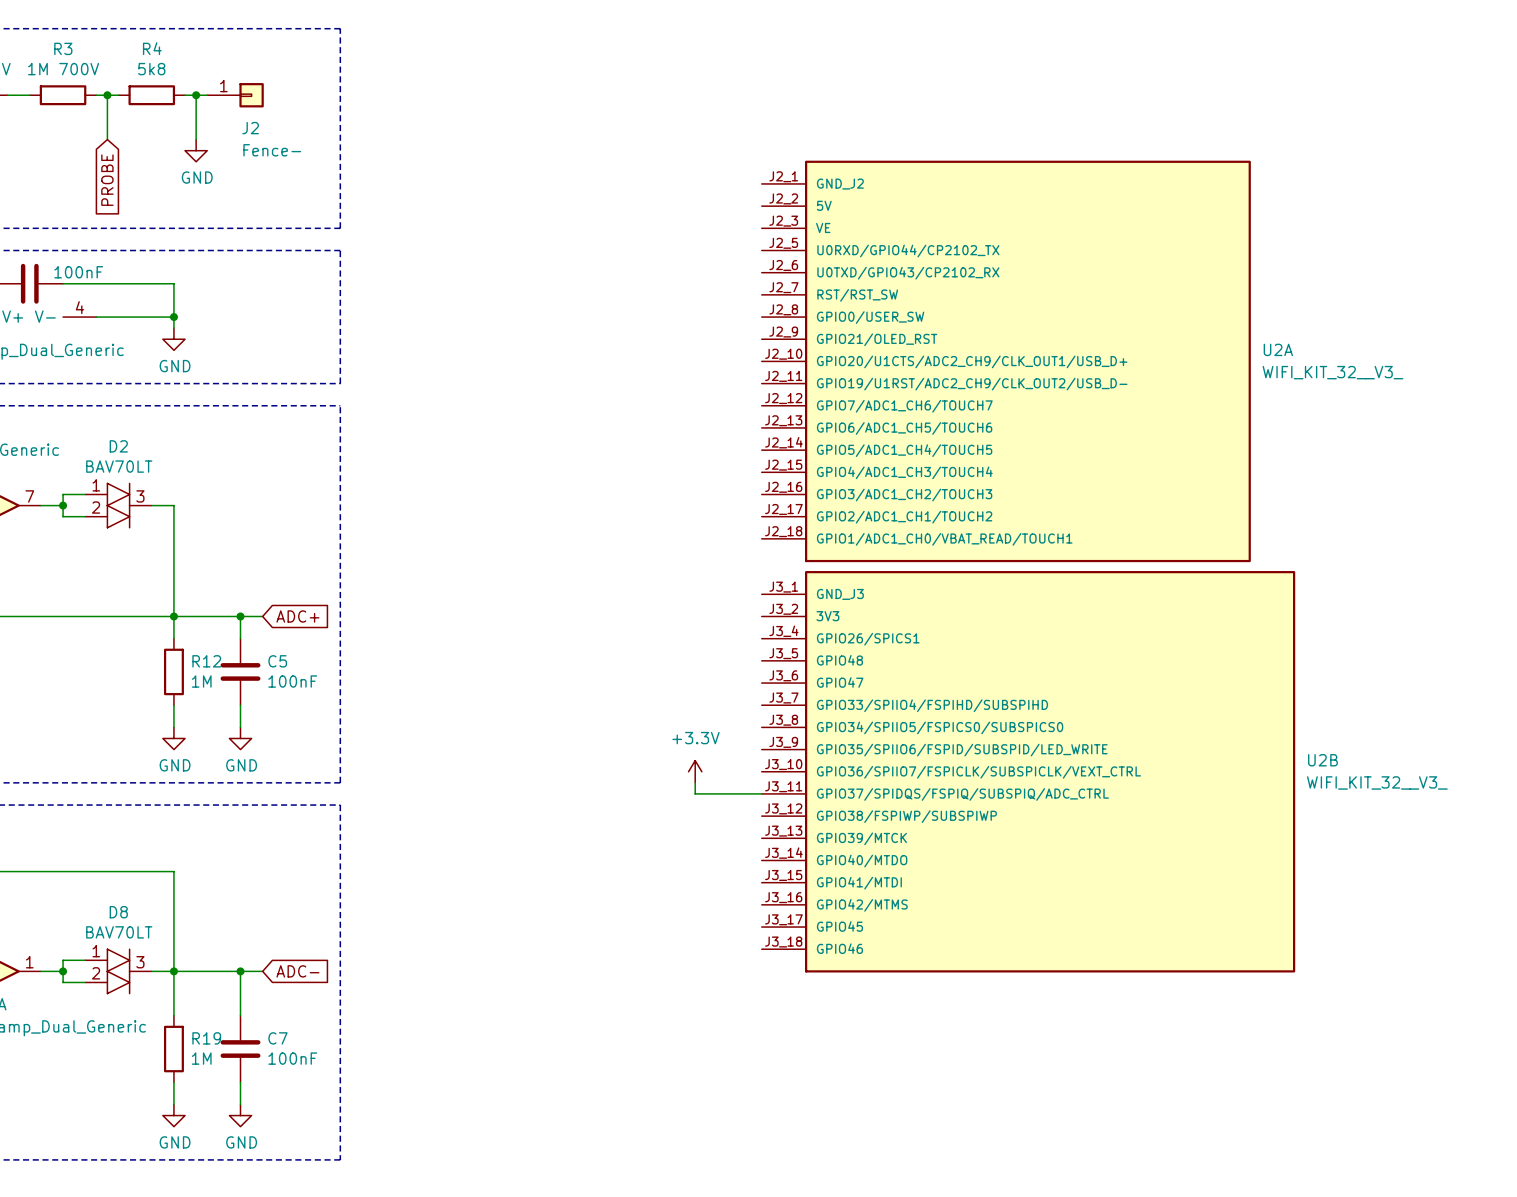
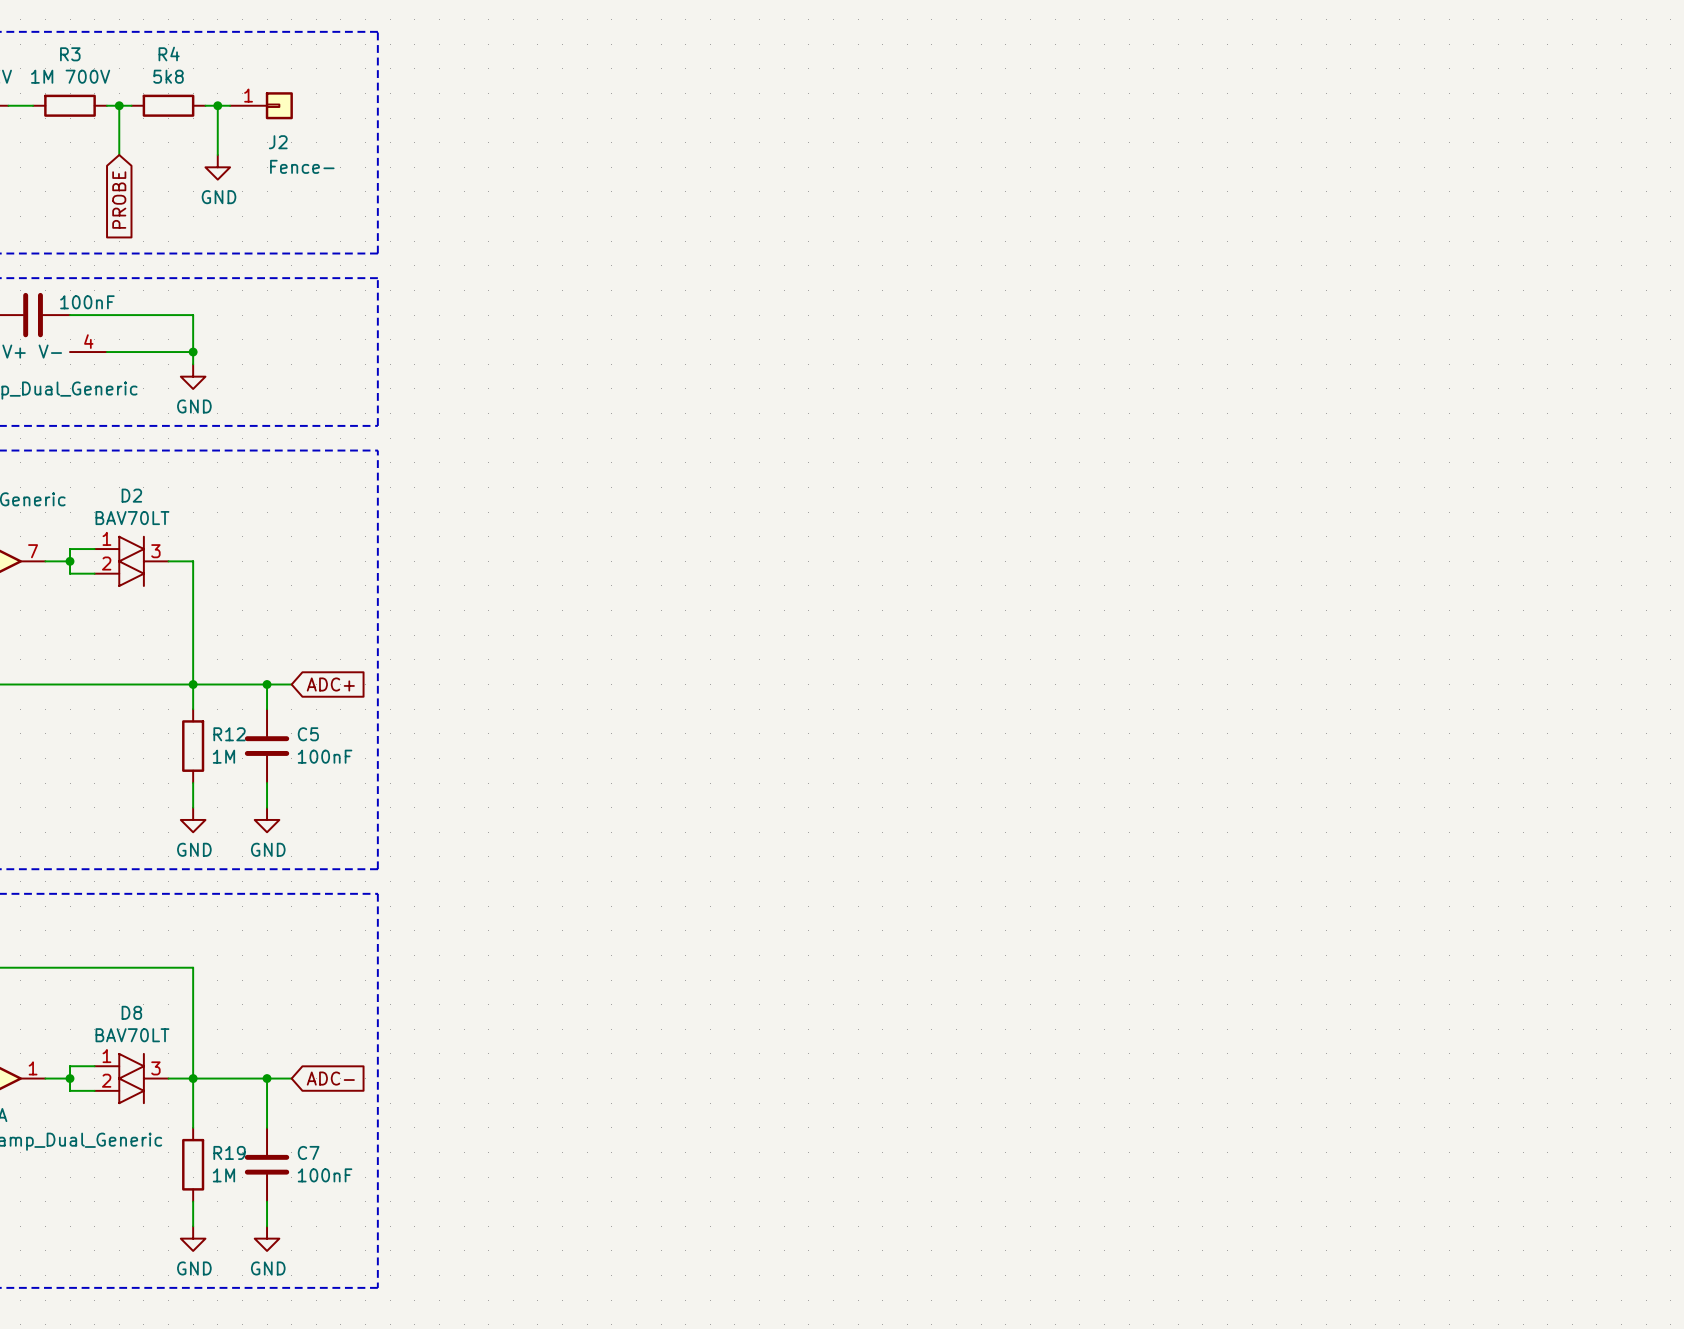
U2A: WIFI_KIT_32__V3_ (1006, 361) -> none
power symbol: +3.3V (695, 771) -> none
U2B: WIFI_KIT_32__V3_ (1028, 771) -> none
wire: (695, 782) (695, 793) (761, 793) -> none

